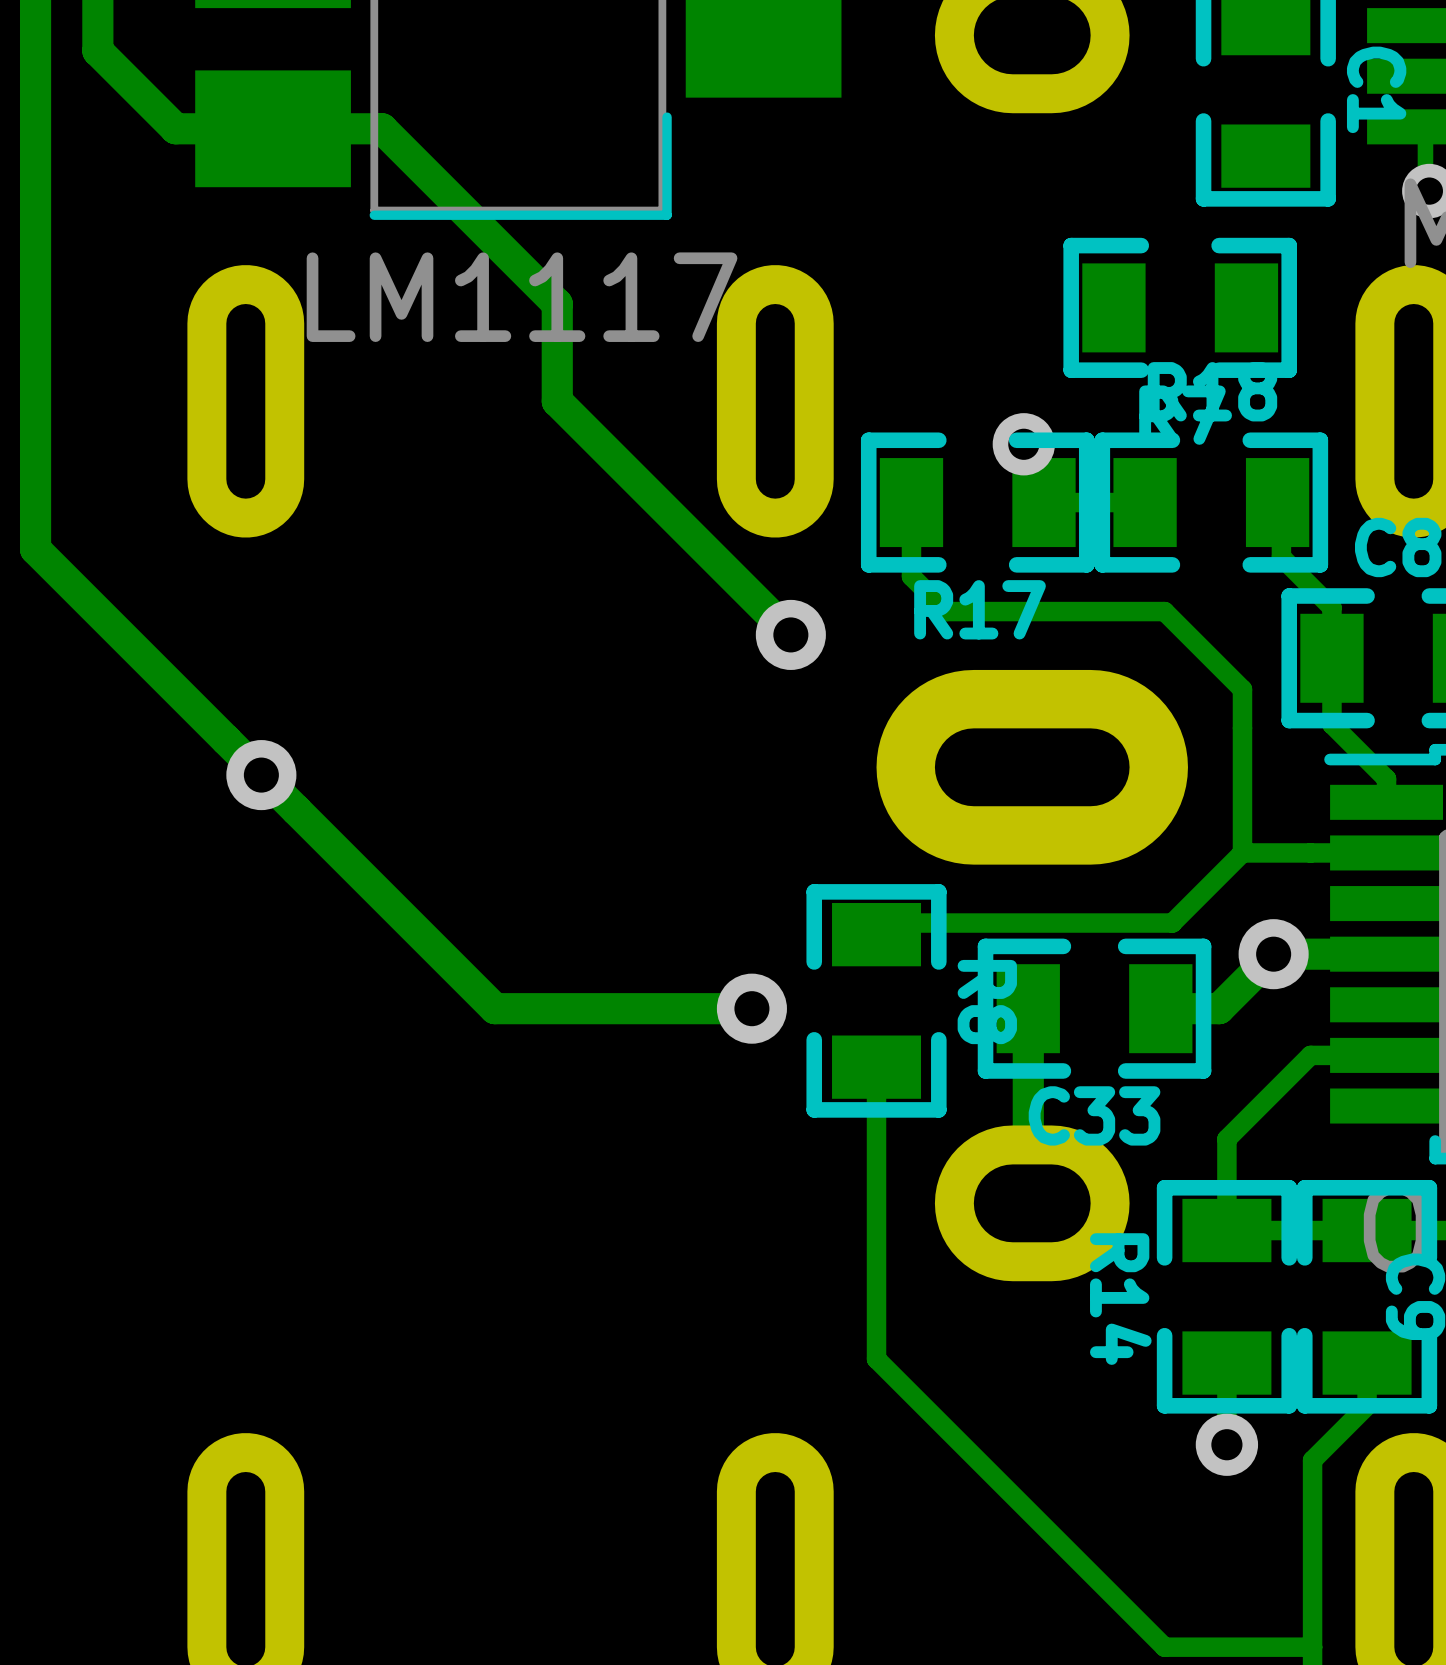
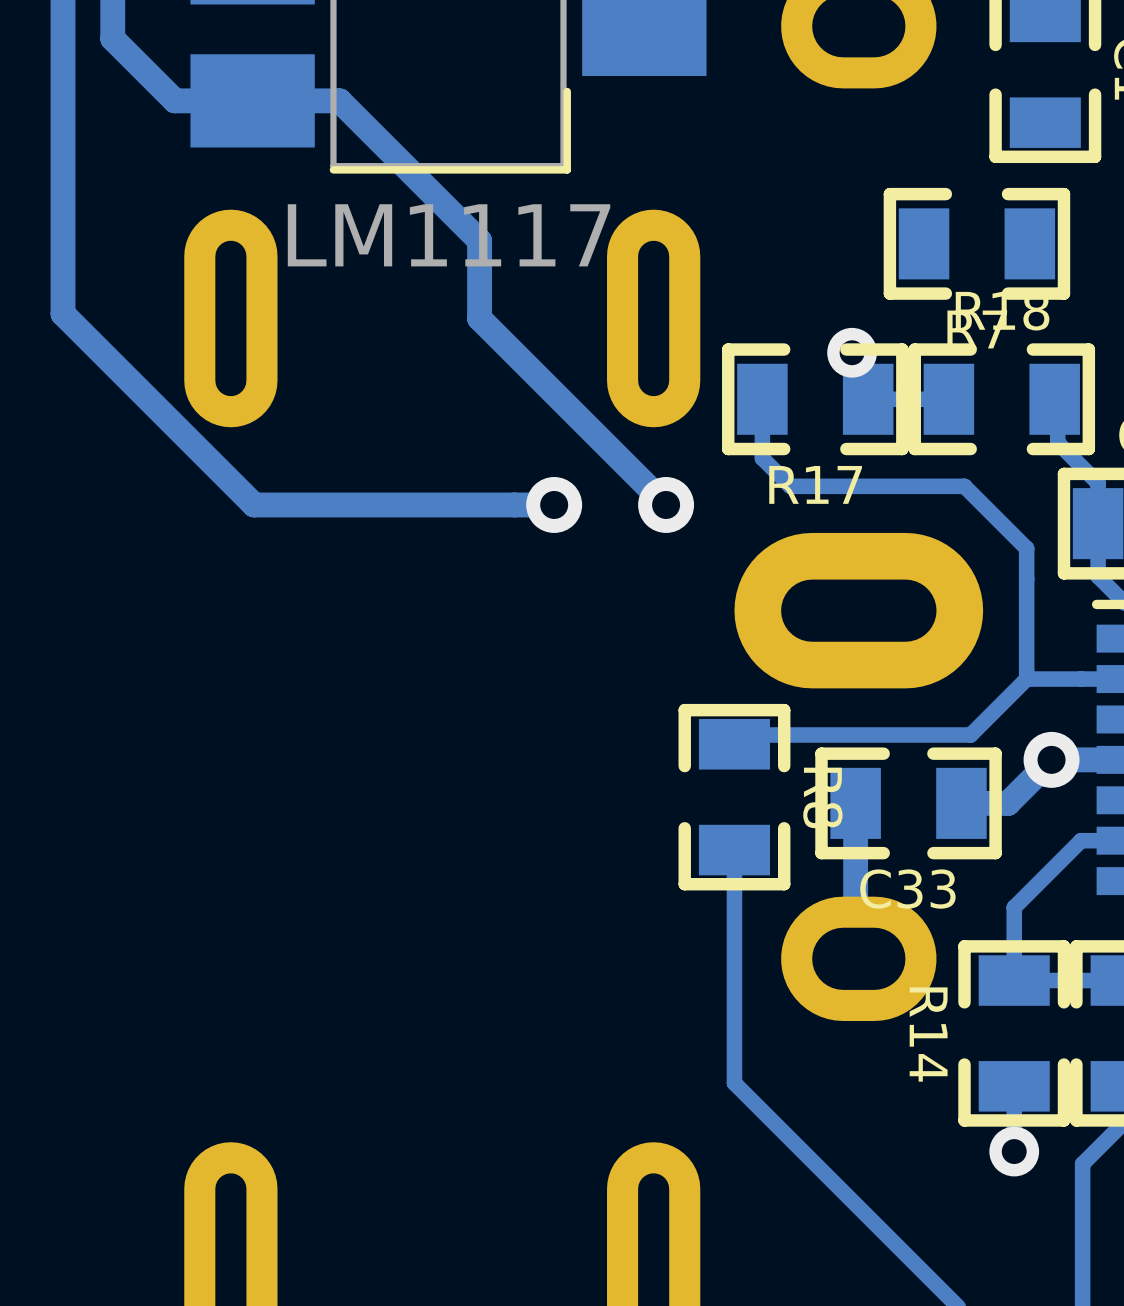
track: (35, 395) (35, 549) (494, 1008) (751, 1008) -> (63, 313) (254, 504) (554, 504)
via: none -> (554, 504)
via: (261, 775) -> none
via: (751, 1008) -> none

